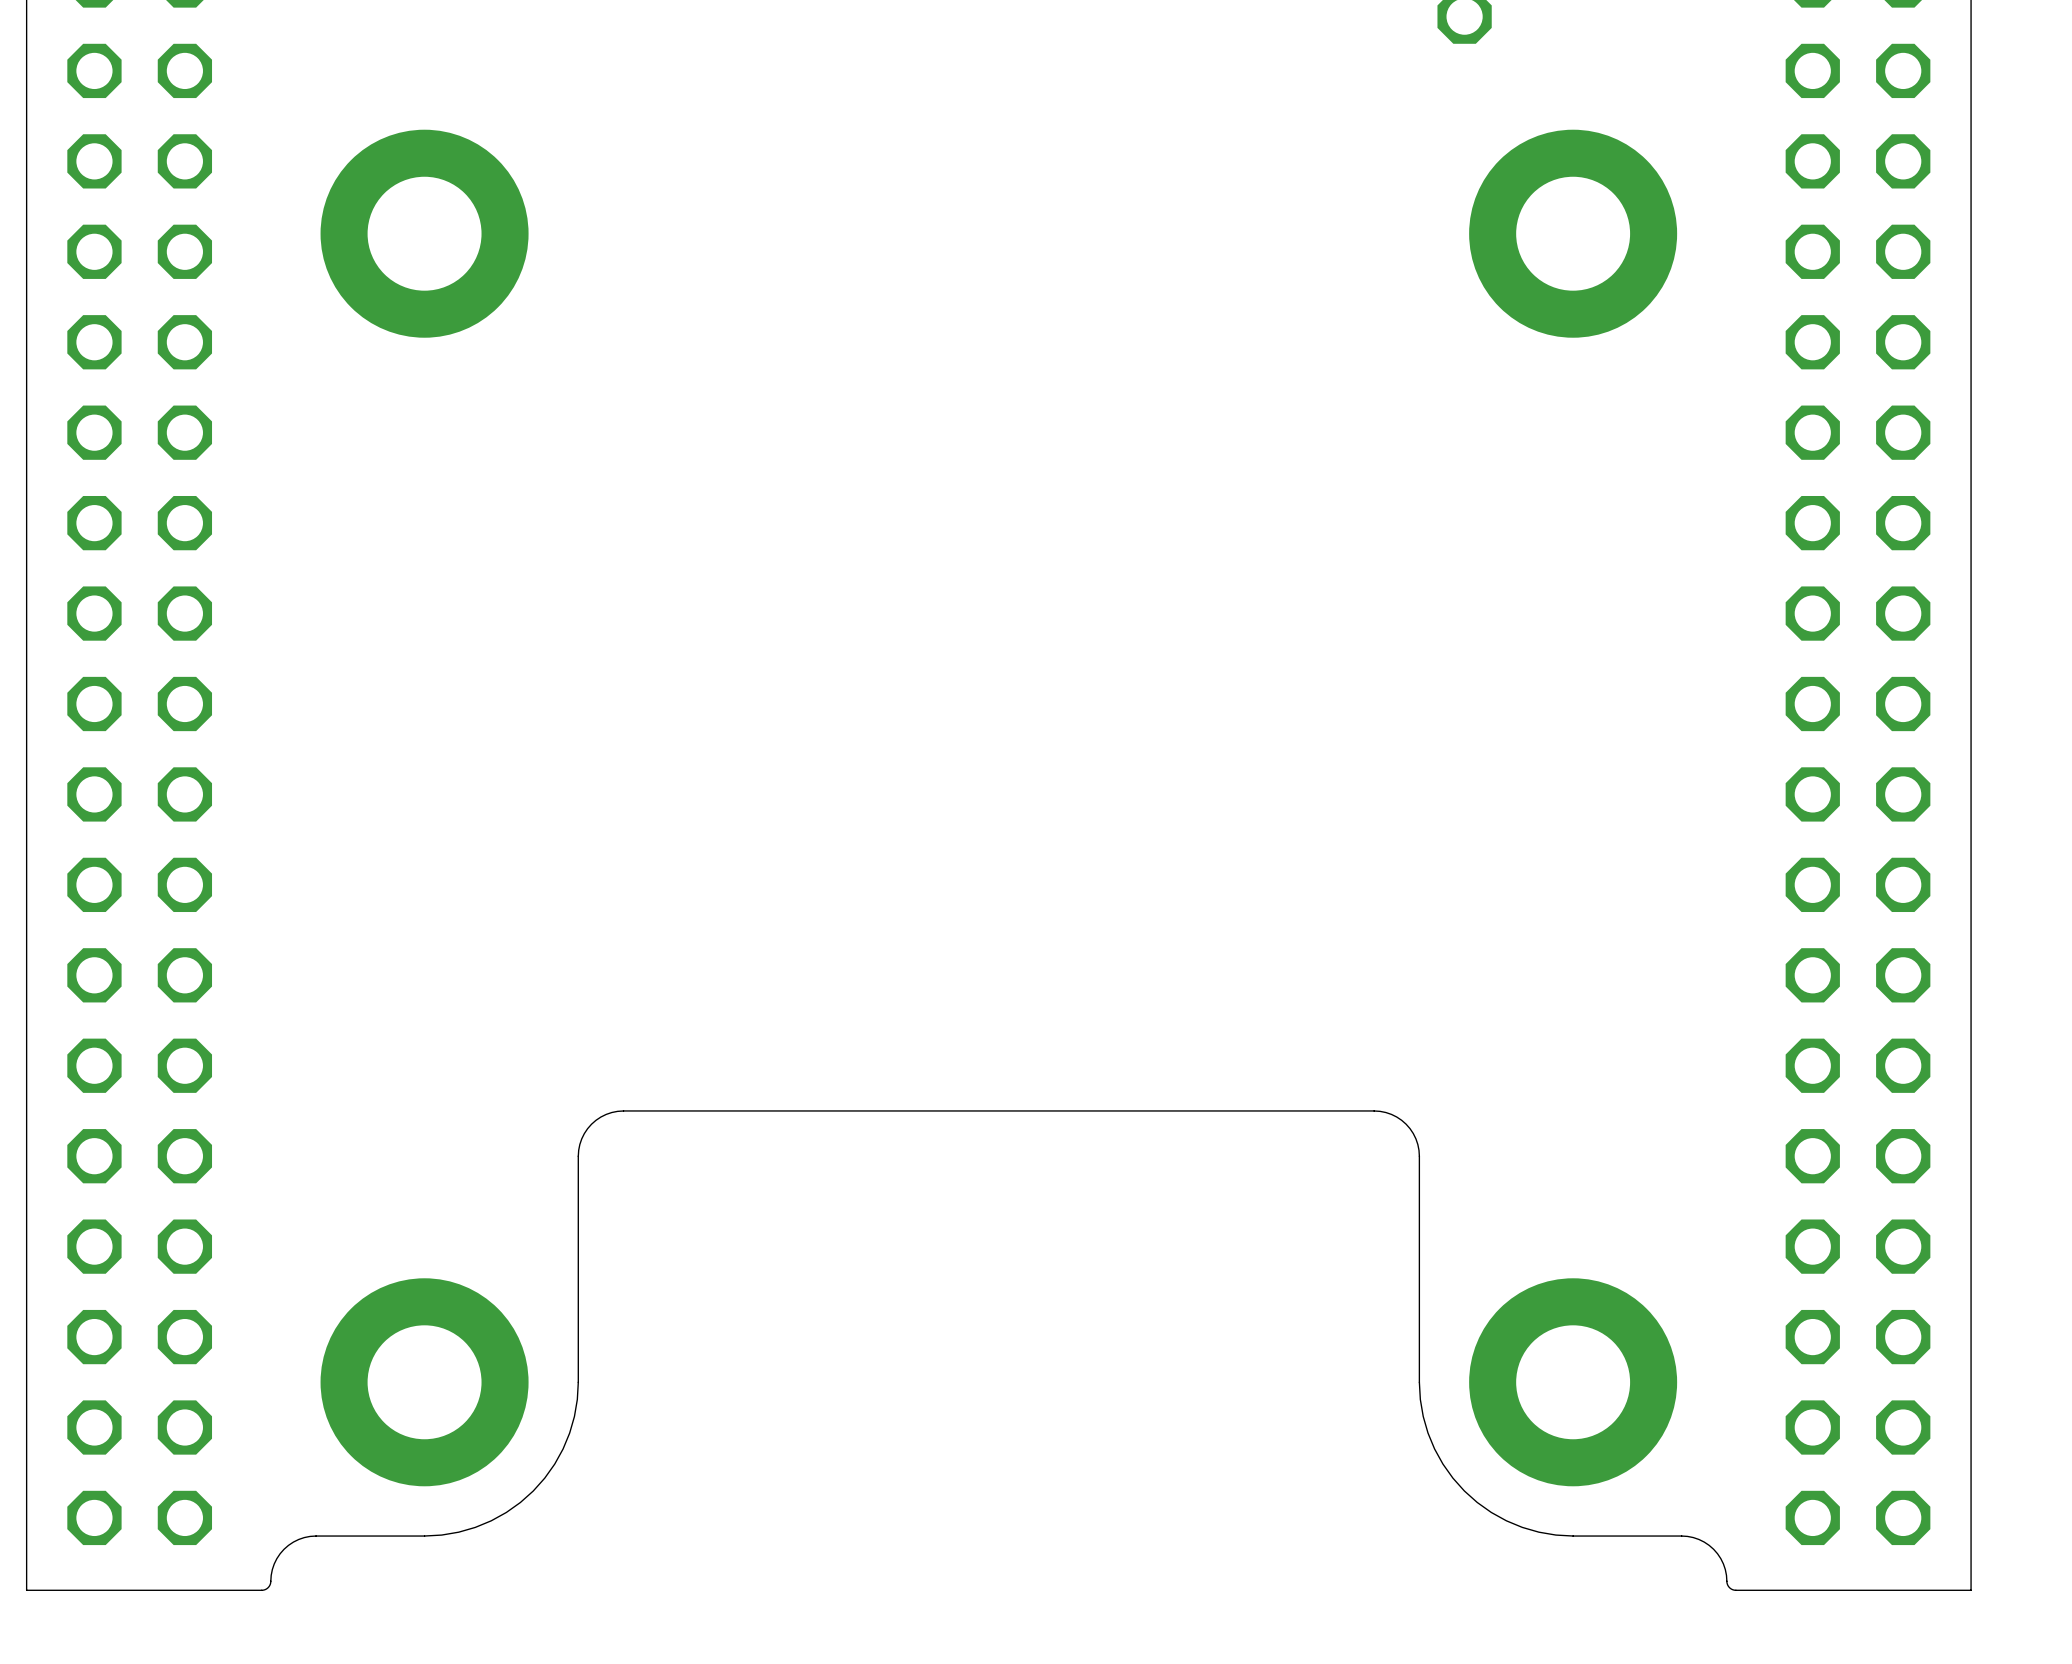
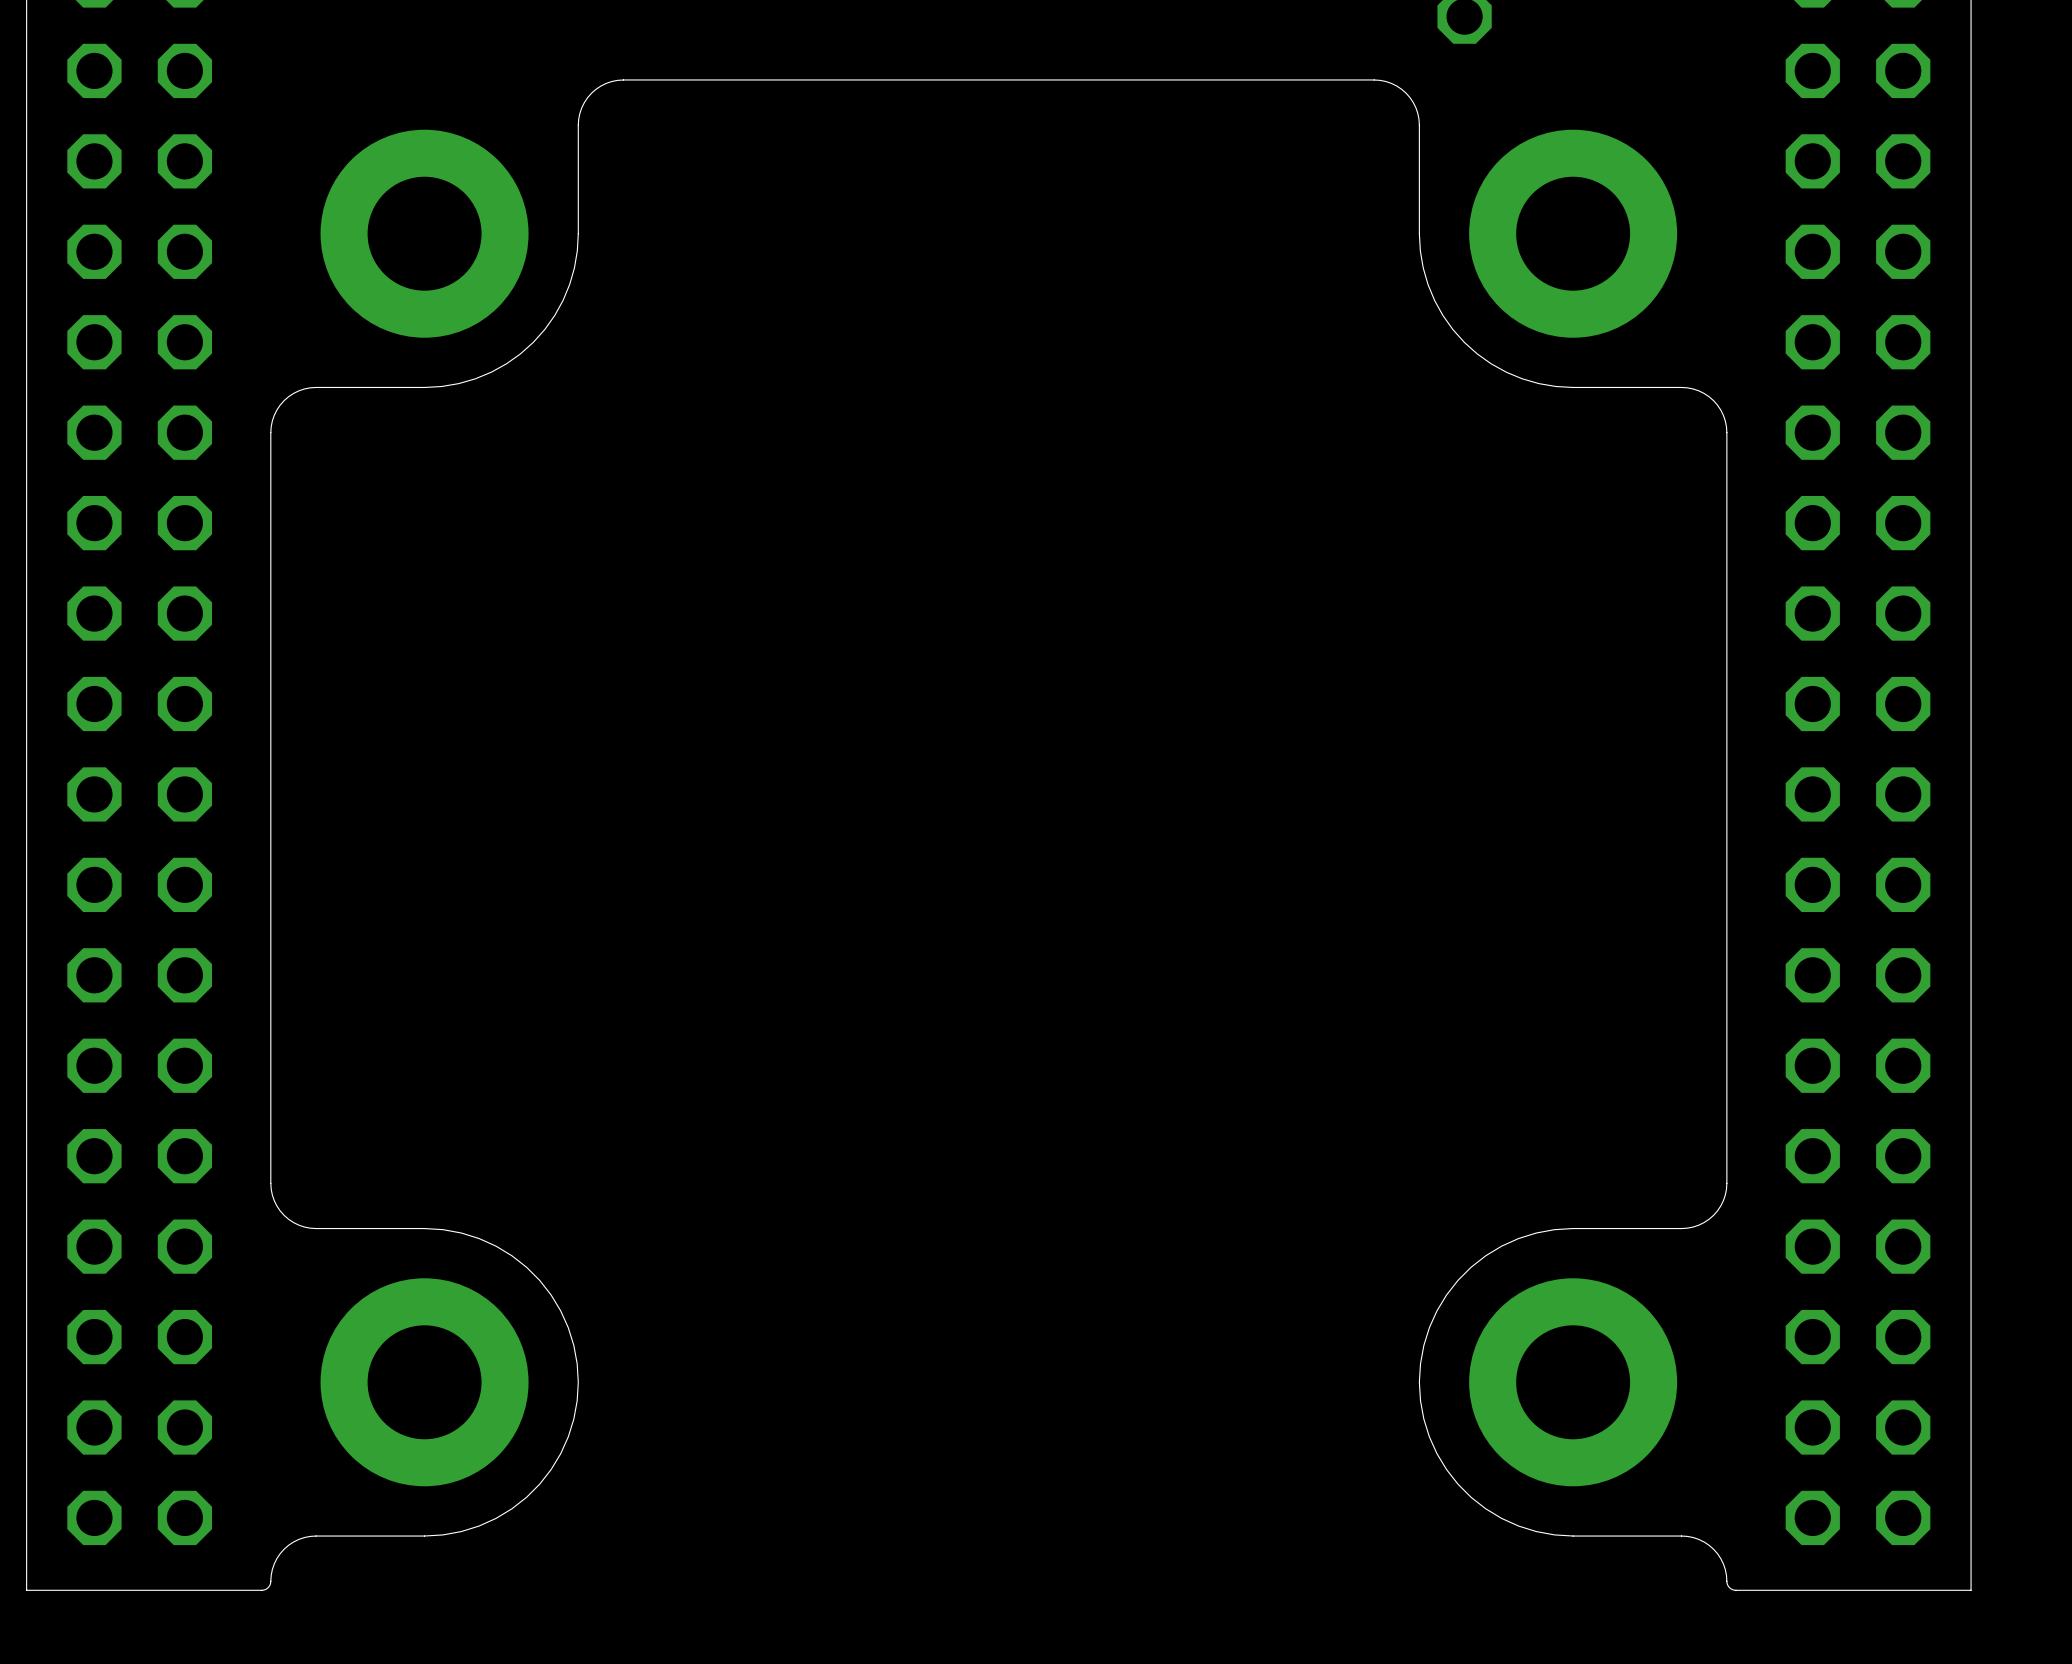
board edge: (1573, 1536) (1555, 1535) (1522, 1527) (1491, 1512) (1464, 1491) (1442, 1464) (1434, 1448) (1423, 1416) (1419, 1382) (1418, 1150) (1413, 1133) (1401, 1120) (1385, 1112) (1374, 1110) (623, 1110) (606, 1114) (595, 1120) (587, 1128) (581, 1138) (578, 1150) (578, 1382) (574, 1416) (563, 1448) (554, 1464) (533, 1491) (506, 1512) (475, 1527) (441, 1535) (424, 1536) -> (1573, 1536) (1554, 1534) (1518, 1526) (1485, 1508) (1458, 1484) (1436, 1453) (1429, 1436) (1420, 1400) (1420, 1363) (1429, 1327) (1446, 1294) (1471, 1267) (1501, 1246) (1518, 1238) (1554, 1229) (1693, 1227) (1704, 1222) (1713, 1215) (1720, 1205) (1725, 1195) (1726, 1183) (1726, 426) (1723, 415) (1717, 405) (1704, 393) (1693, 389) (1573, 387) (1538, 383) (1522, 378) (1491, 363) (1464, 342) (1442, 315) (1428, 284) (1423, 267) (1419, 233) (1419, 125) (1415, 107) (1410, 97) (1396, 86) (1385, 81) (1374, 79) (623, 79) (611, 81) (600, 86) (591, 93) (584, 102) (579, 113) (578, 233) (574, 267) (569, 284) (554, 315) (533, 342) (506, 363) (475, 378) (458, 383) (424, 387) (310, 387) (293, 393) (284, 400) (276, 410) (272, 420) (270, 432) (270, 1183) (272, 1195) (276, 1205) (284, 1215) (293, 1222) (304, 1227) (443, 1229) (479, 1238) (496, 1246) (526, 1267) (551, 1294) (568, 1327) (577, 1363) (577, 1400) (568, 1436) (560, 1453) (539, 1484) (511, 1508) (479, 1526) (443, 1534) (424, 1536)

